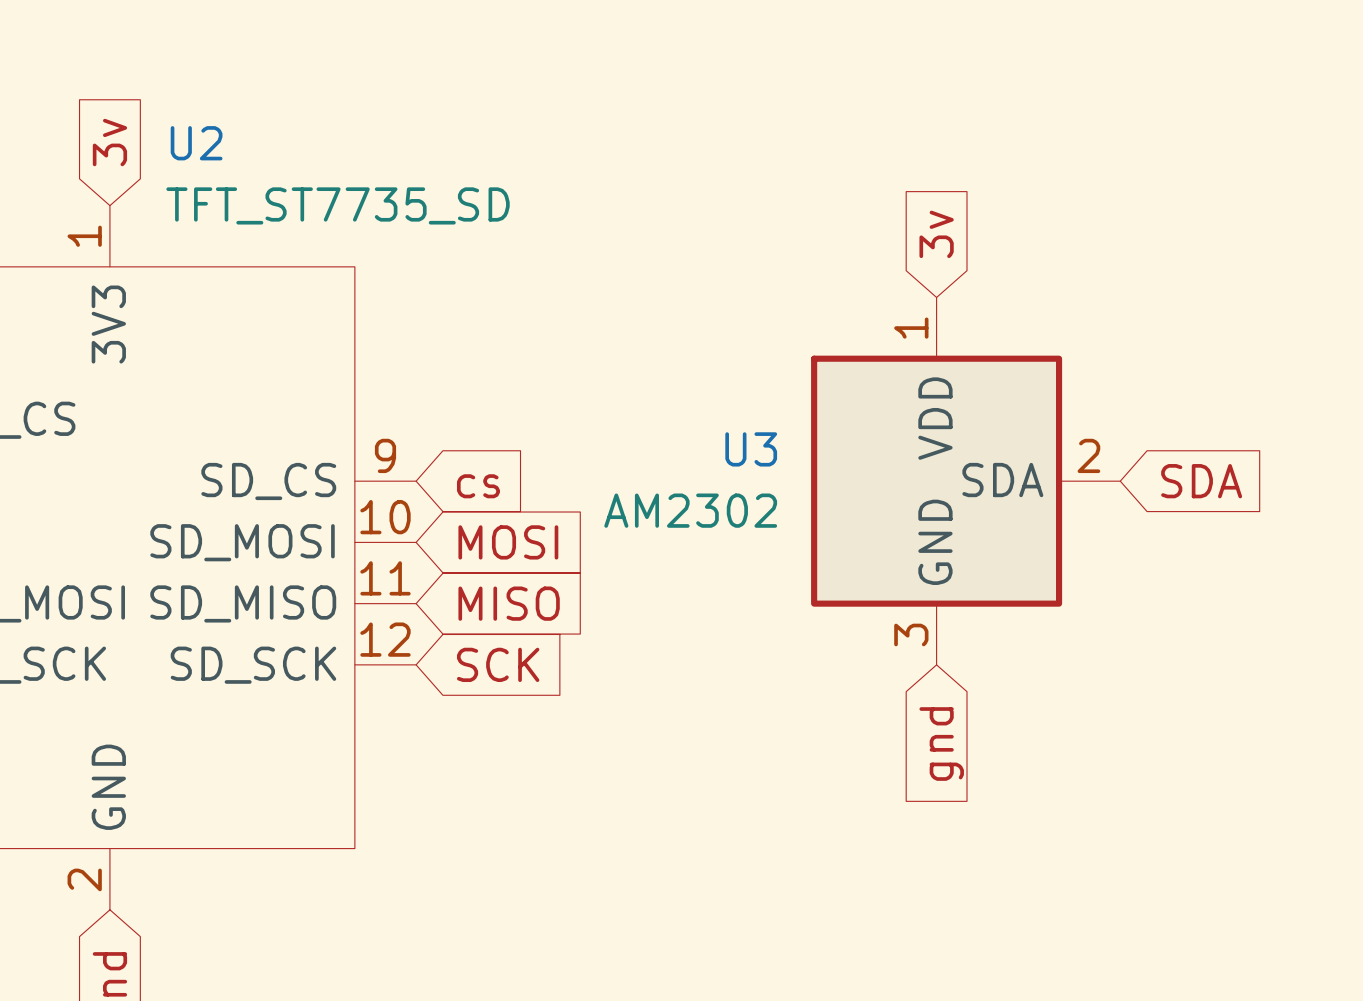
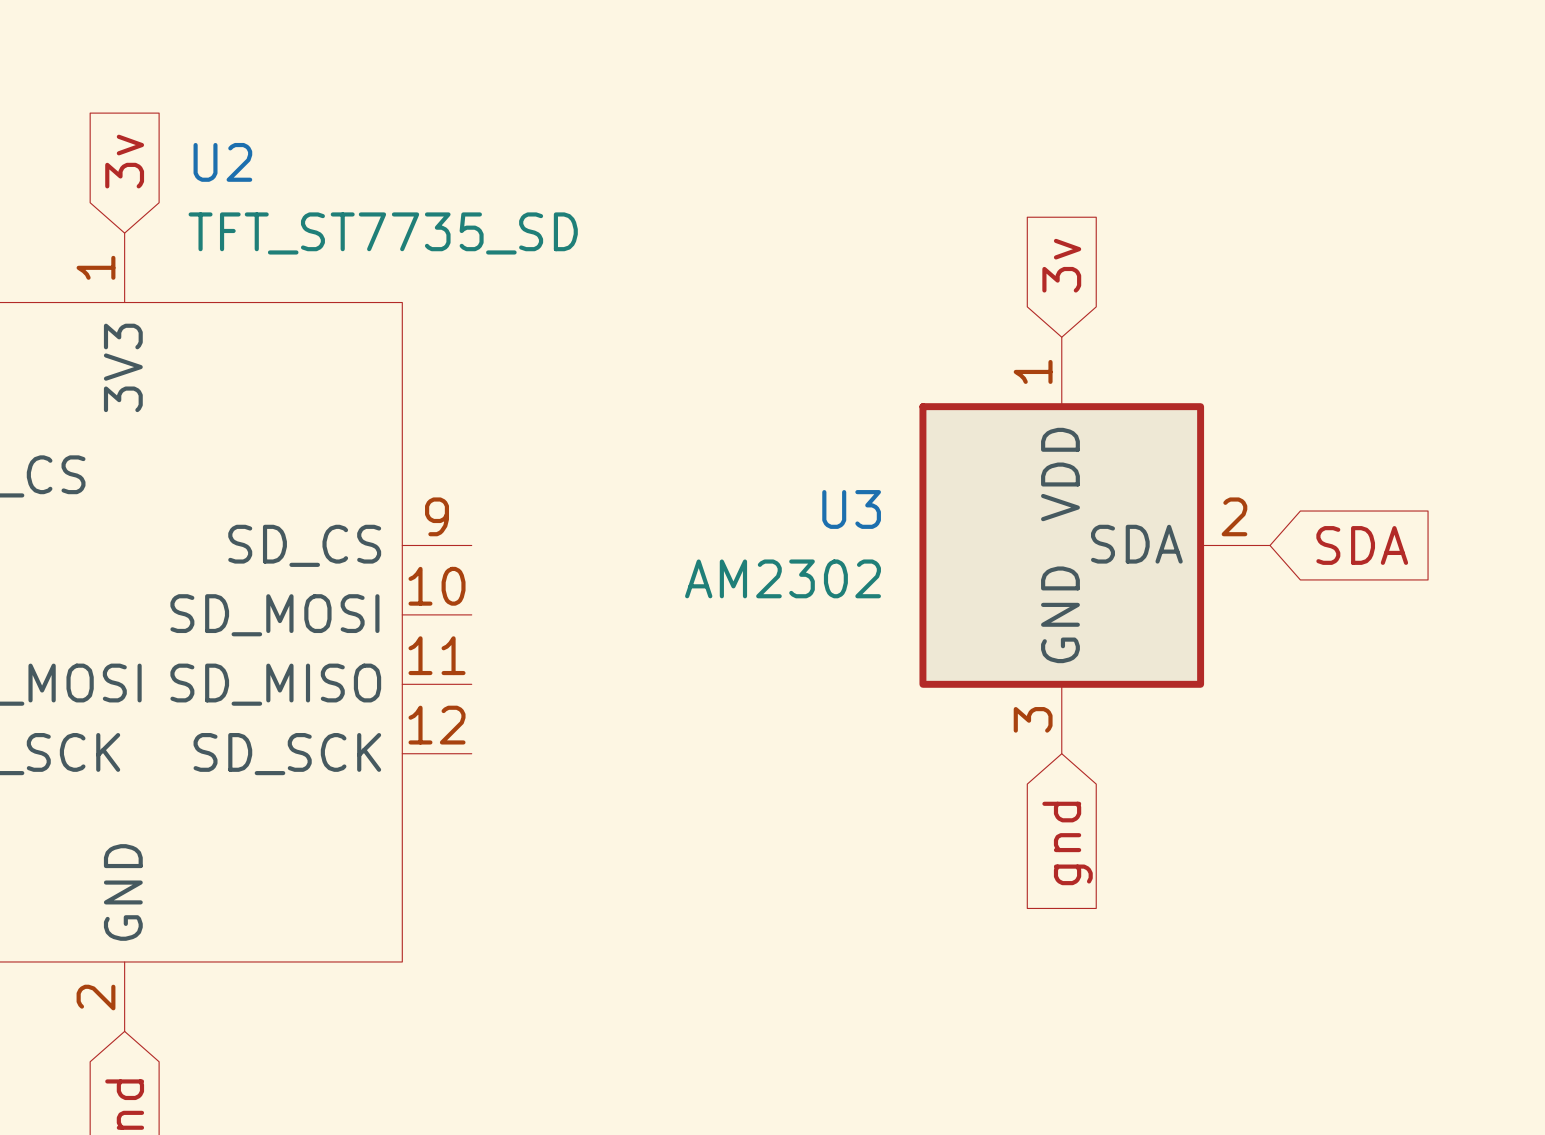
global label: cs (478, 486) -> none
global label: MOSI (508, 542) -> none
global label: MISO (509, 603) -> none
global label: SCK (498, 664) -> none

